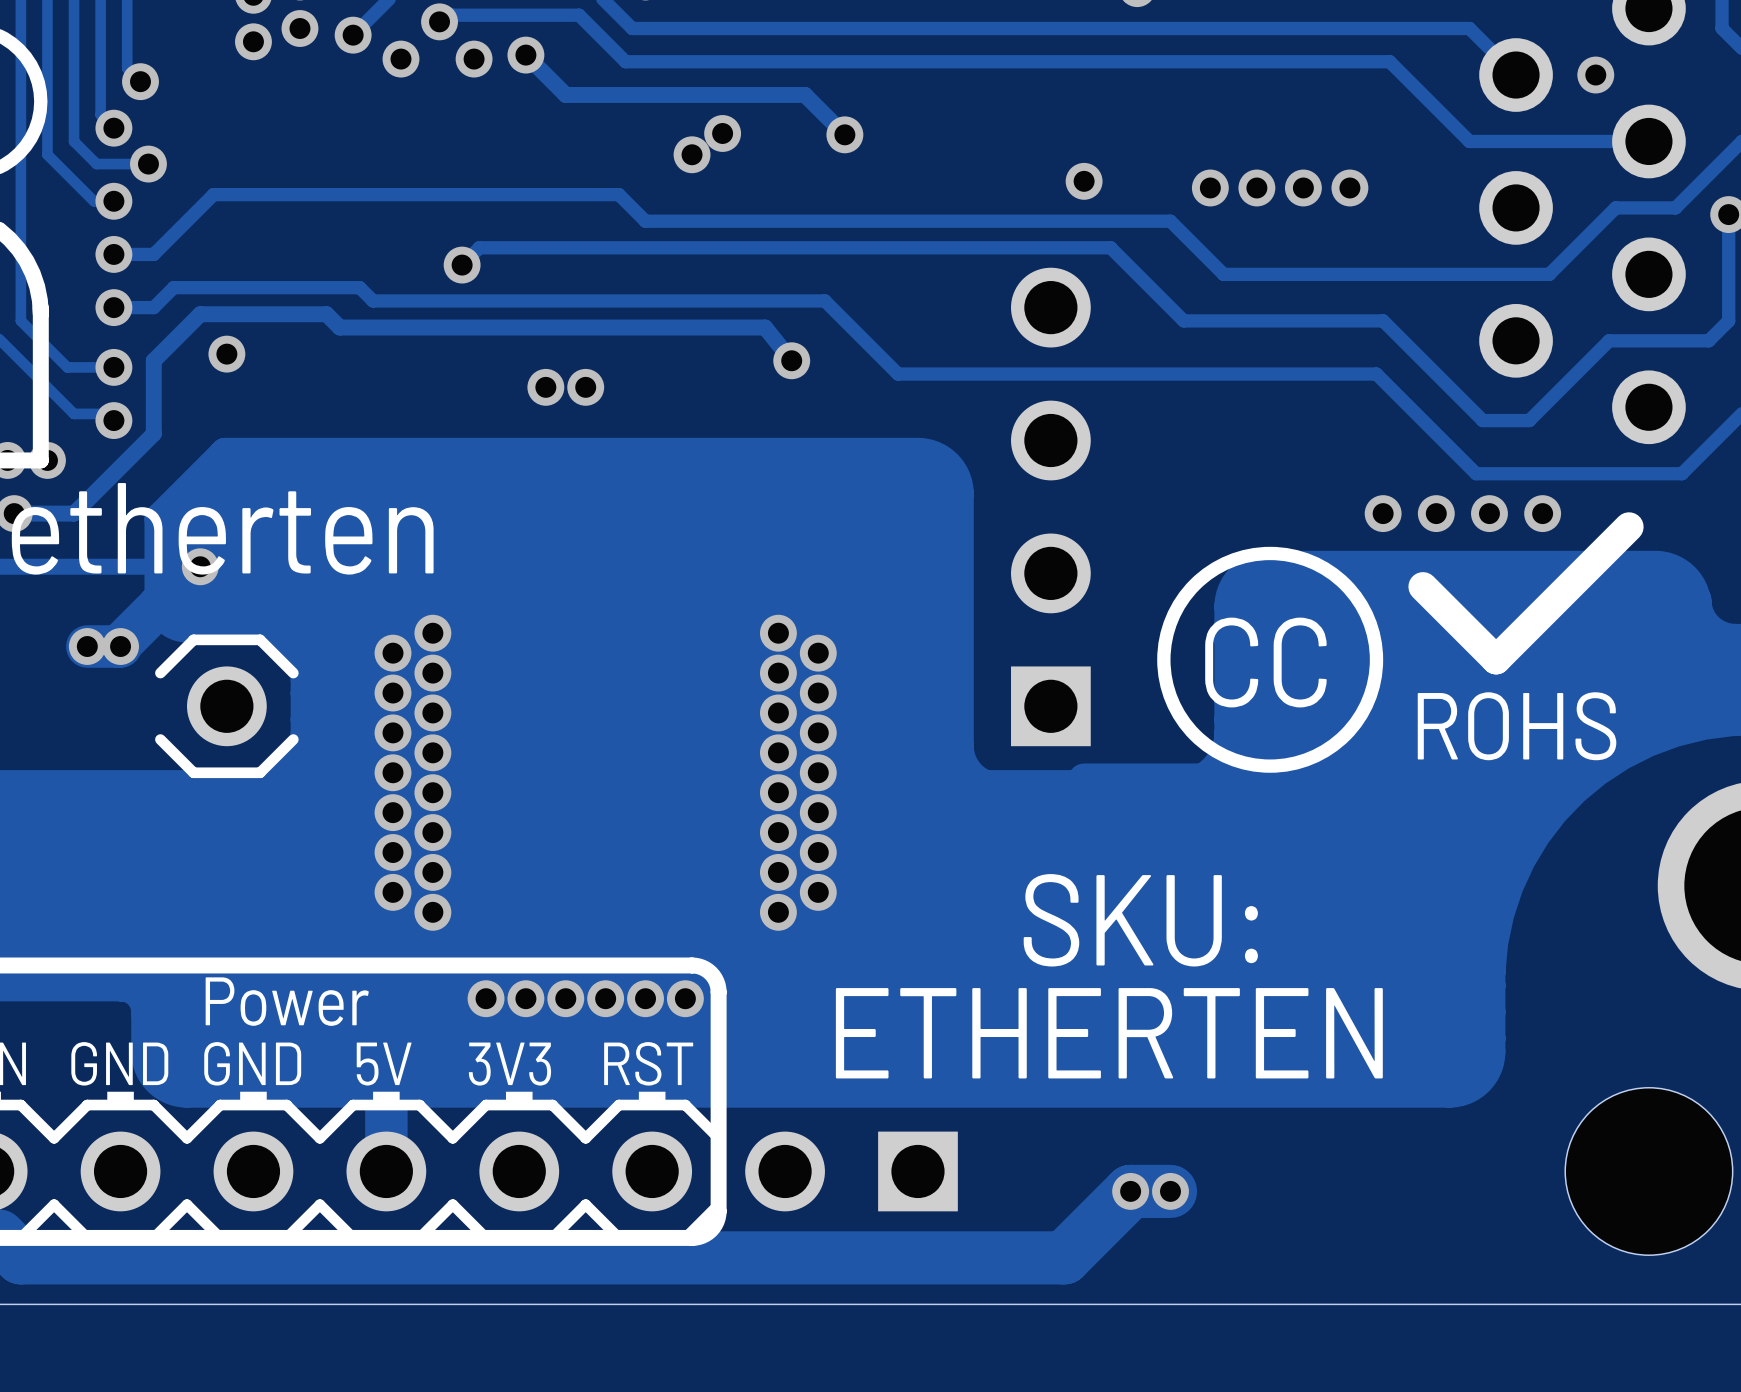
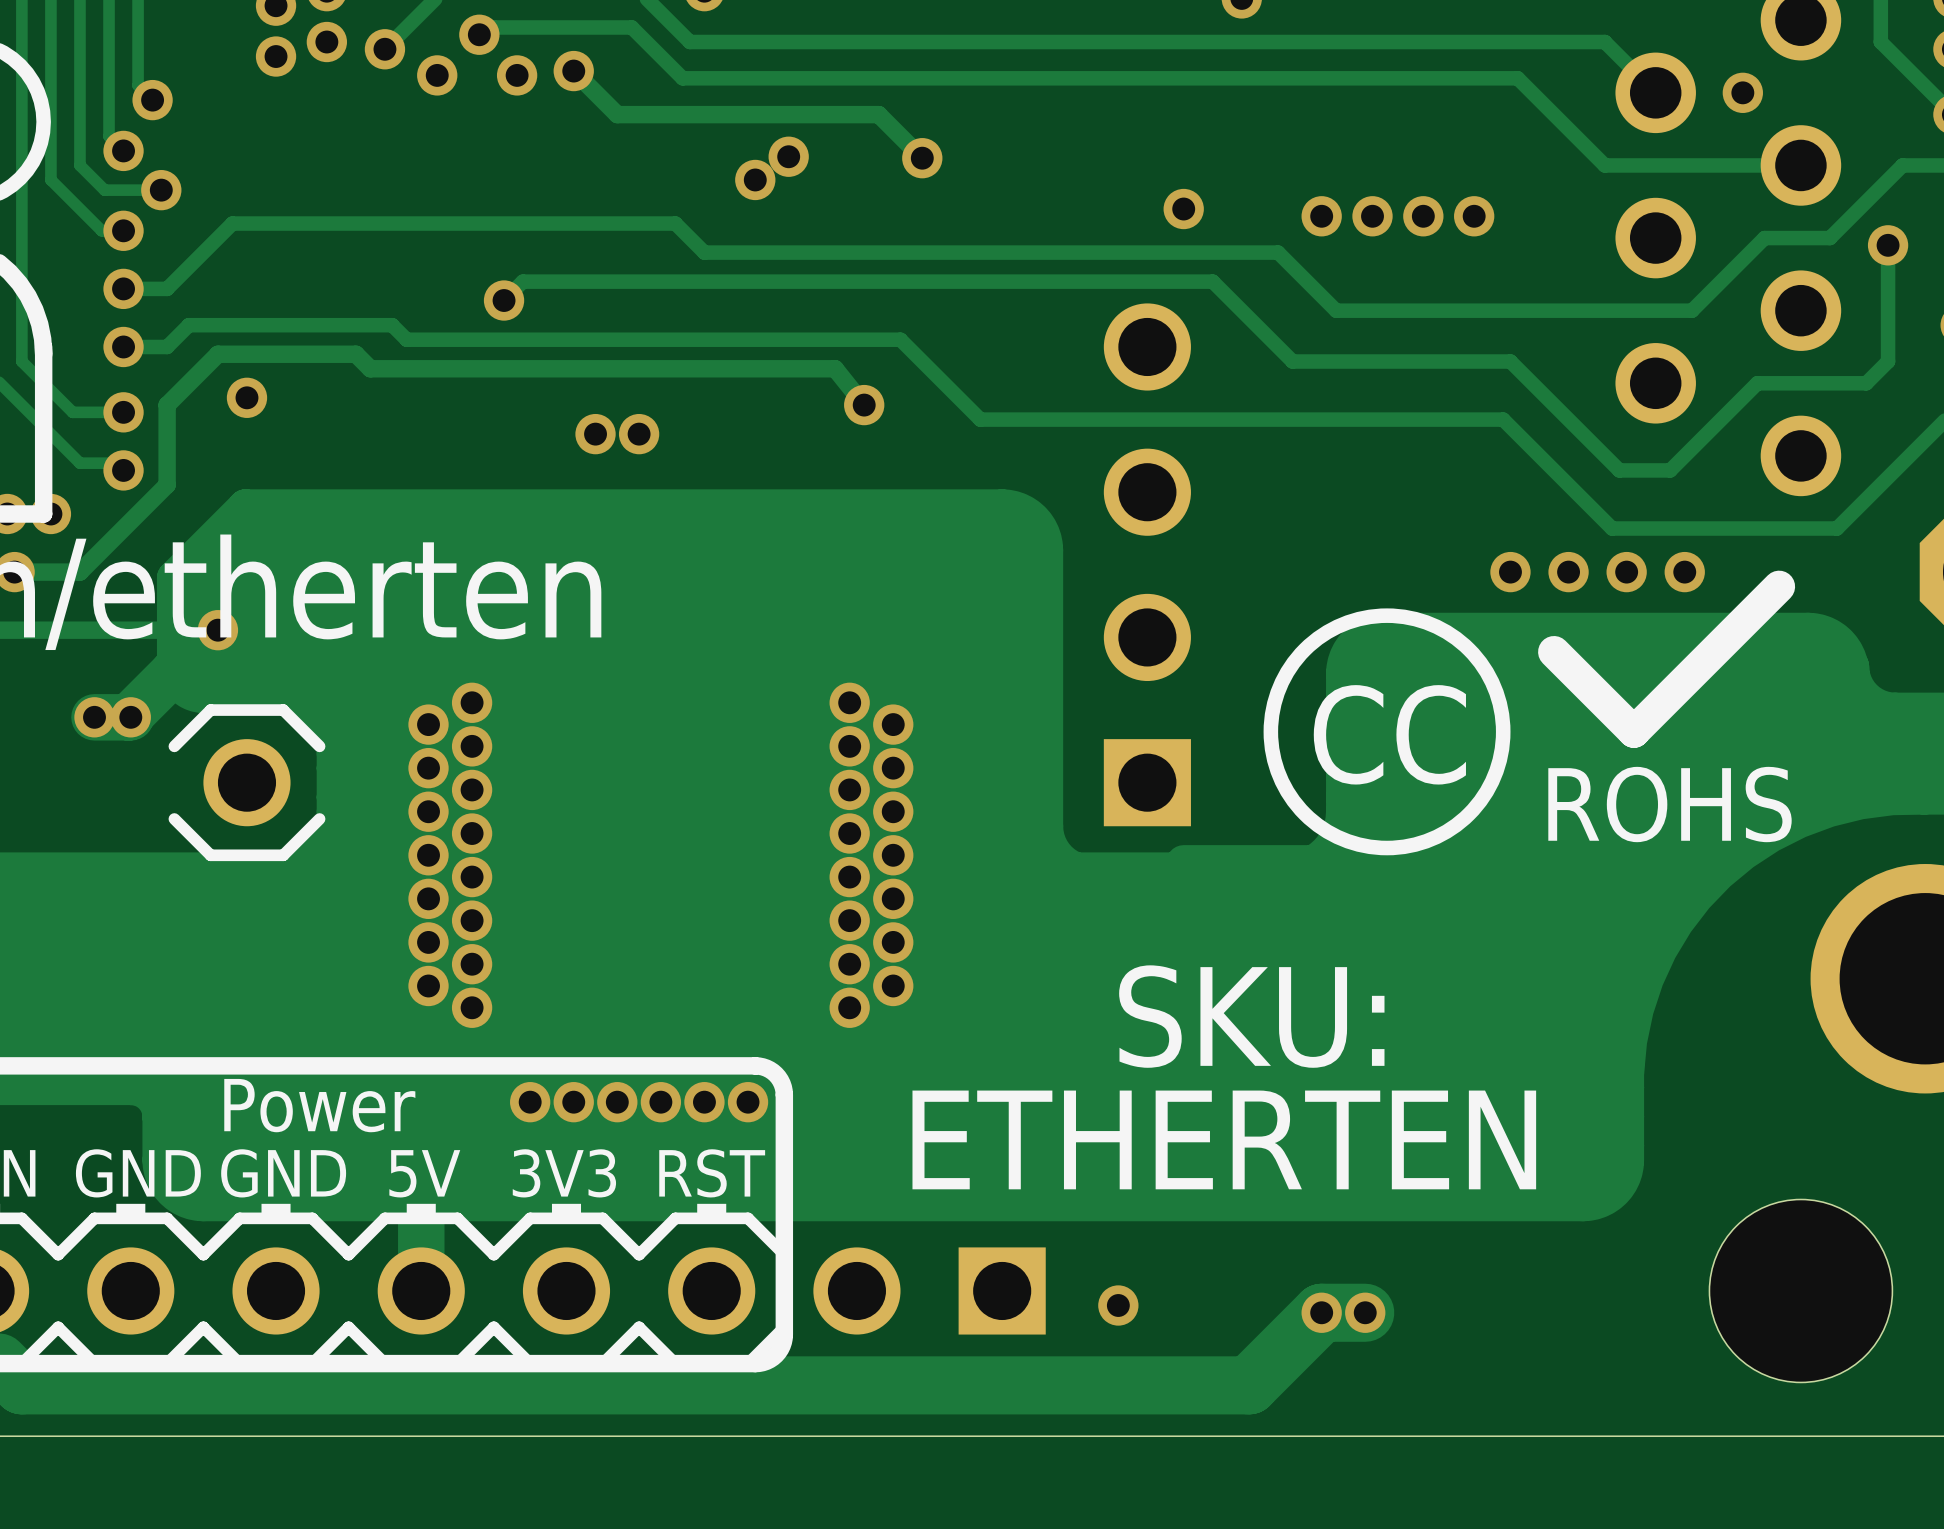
via: none -> (1118, 1305)
via: (1130, 1191) -> none
track: (1170, 1191) (1130, 1191) (1064, 1257) -> (1365, 1312) (1321, 1312) (1249, 1385) (1161, 1385)
via: (1170, 1191) -> none
via: none -> (1321, 1312)
via: none -> (1365, 1312)

